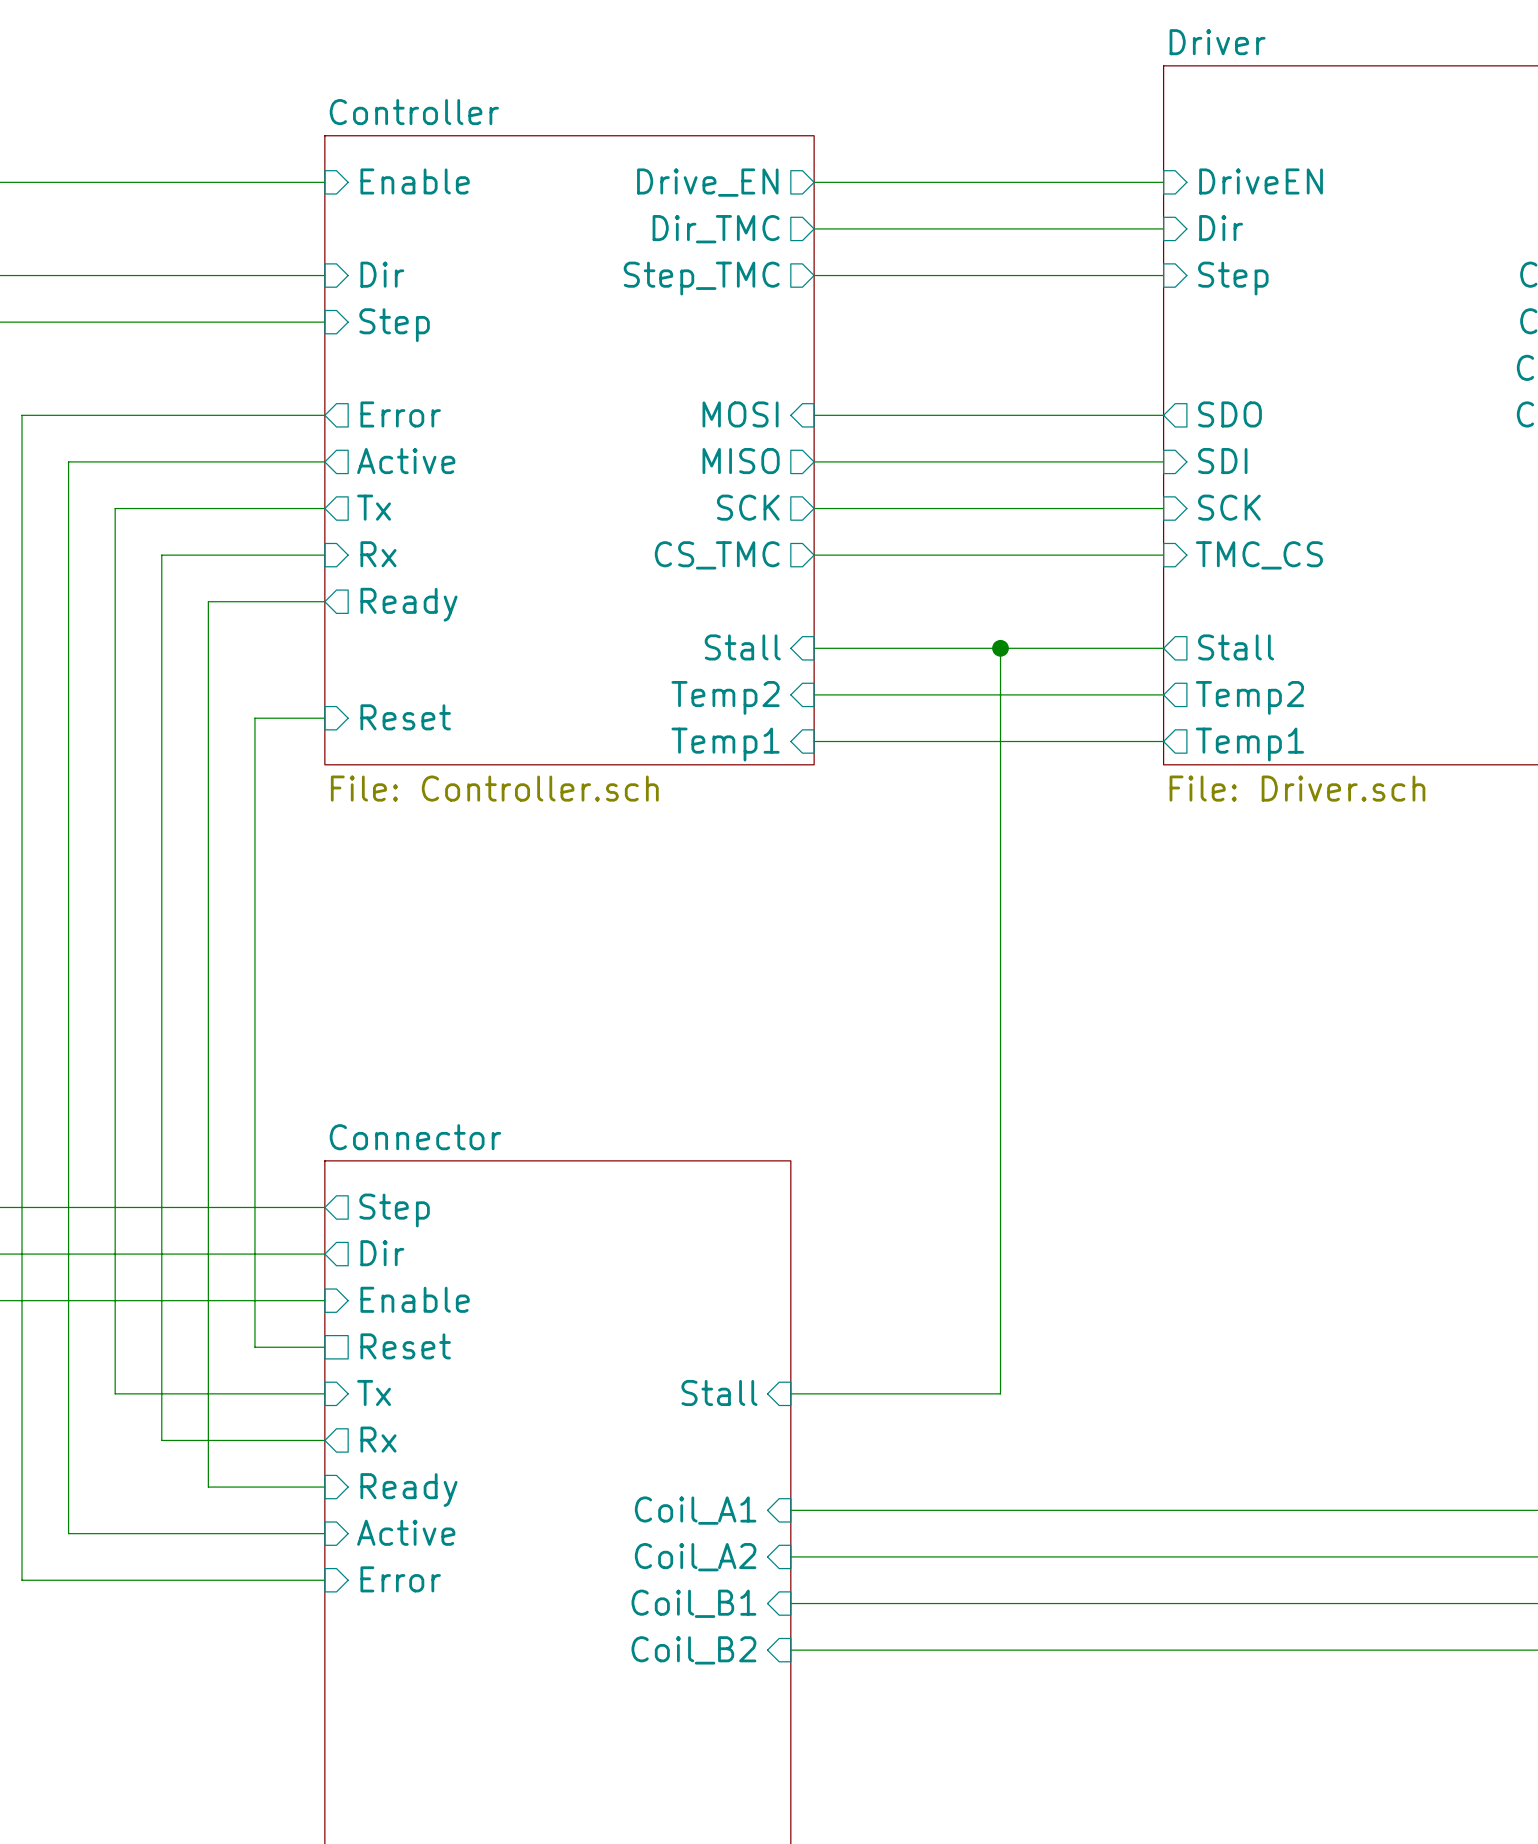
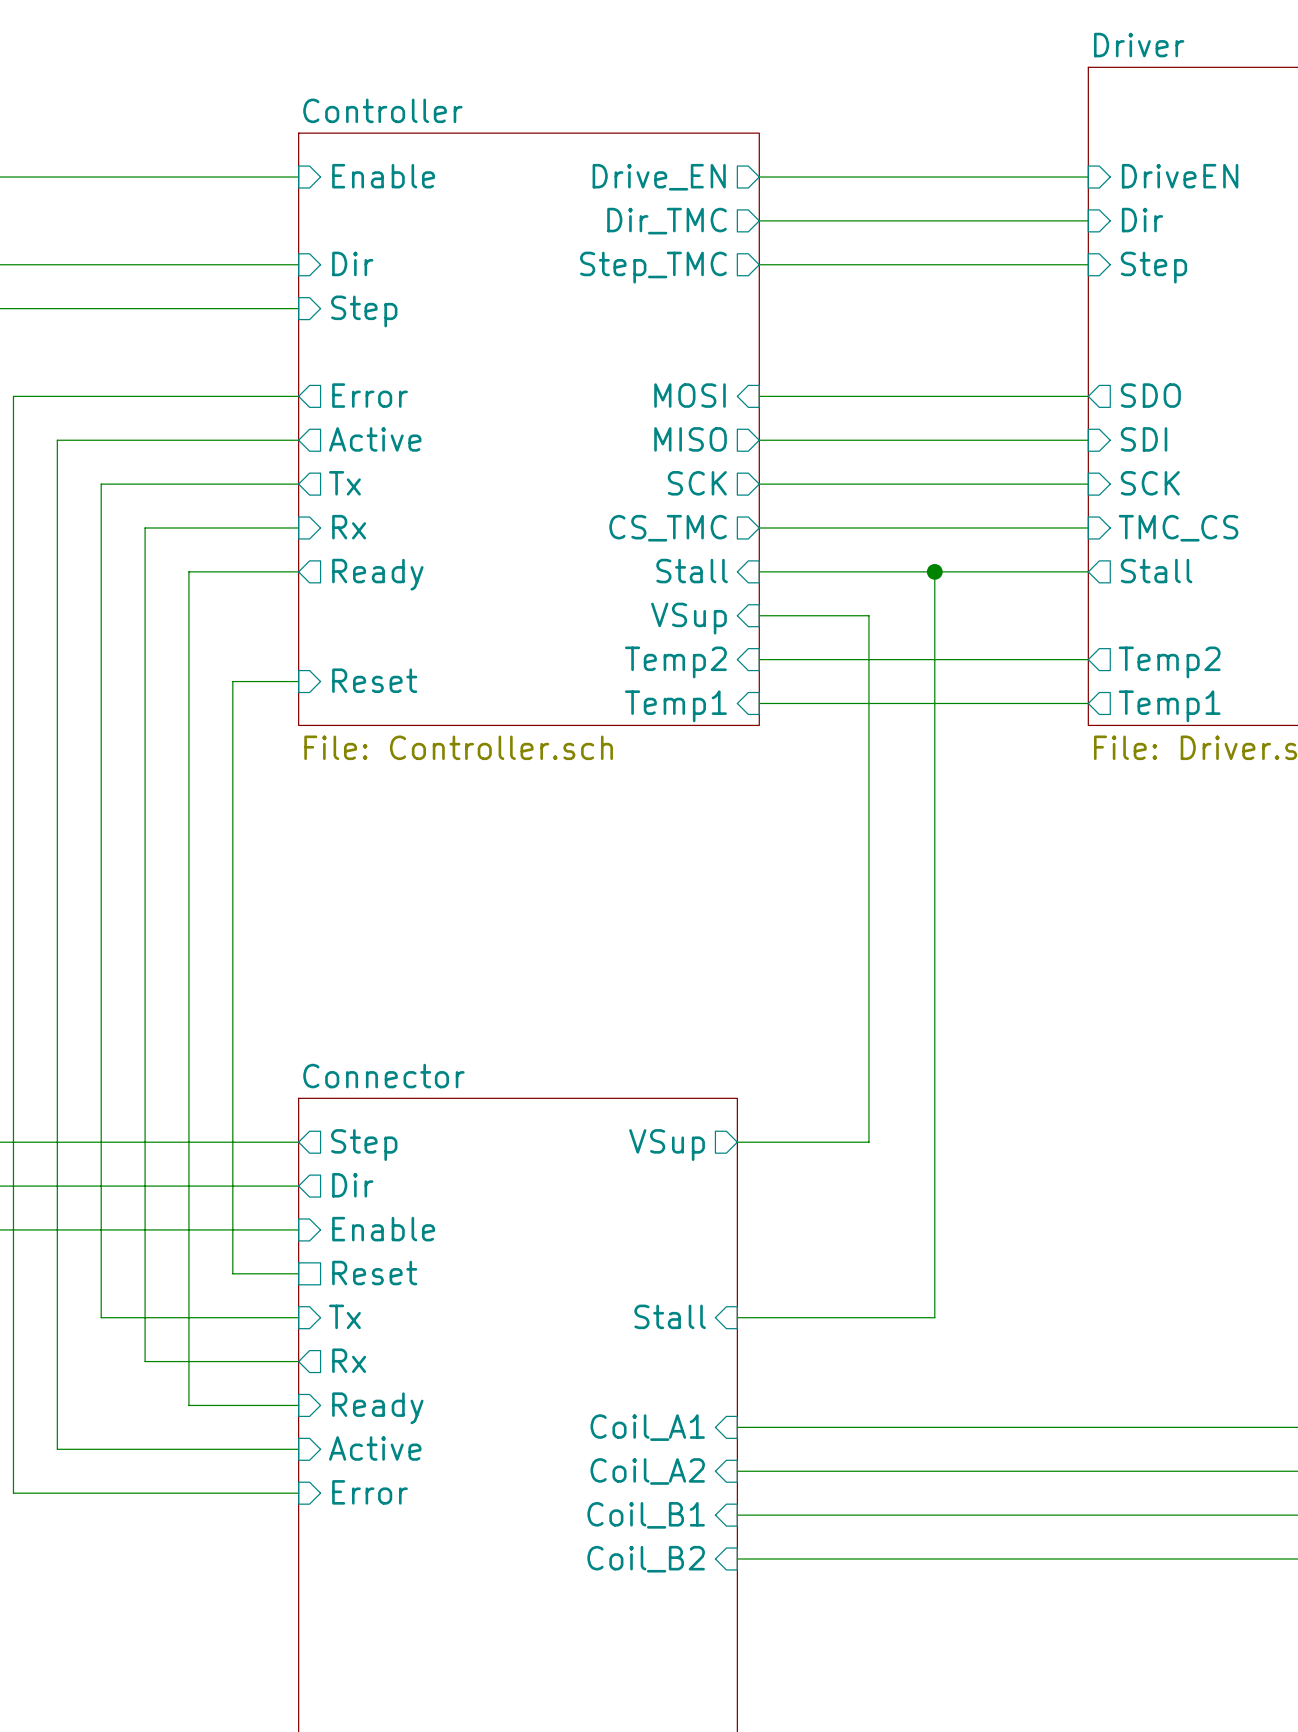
sheet pin: none -> Stall (692, 571)
wire: none -> (759, 571) (1088, 571)
wire: none -> (934, 571) (934, 615)
sheet pin: Stall (742, 647) -> VSup (688, 618)
sheet pin position: Stall (1236, 647) -> Stall (1156, 571)
wire: (930, 648) (1163, 648) -> (868, 615) (868, 1142) (737, 1142)
junction position: (1000, 648) -> (934, 571)
sheet pin: none -> VSup (667, 1145)

